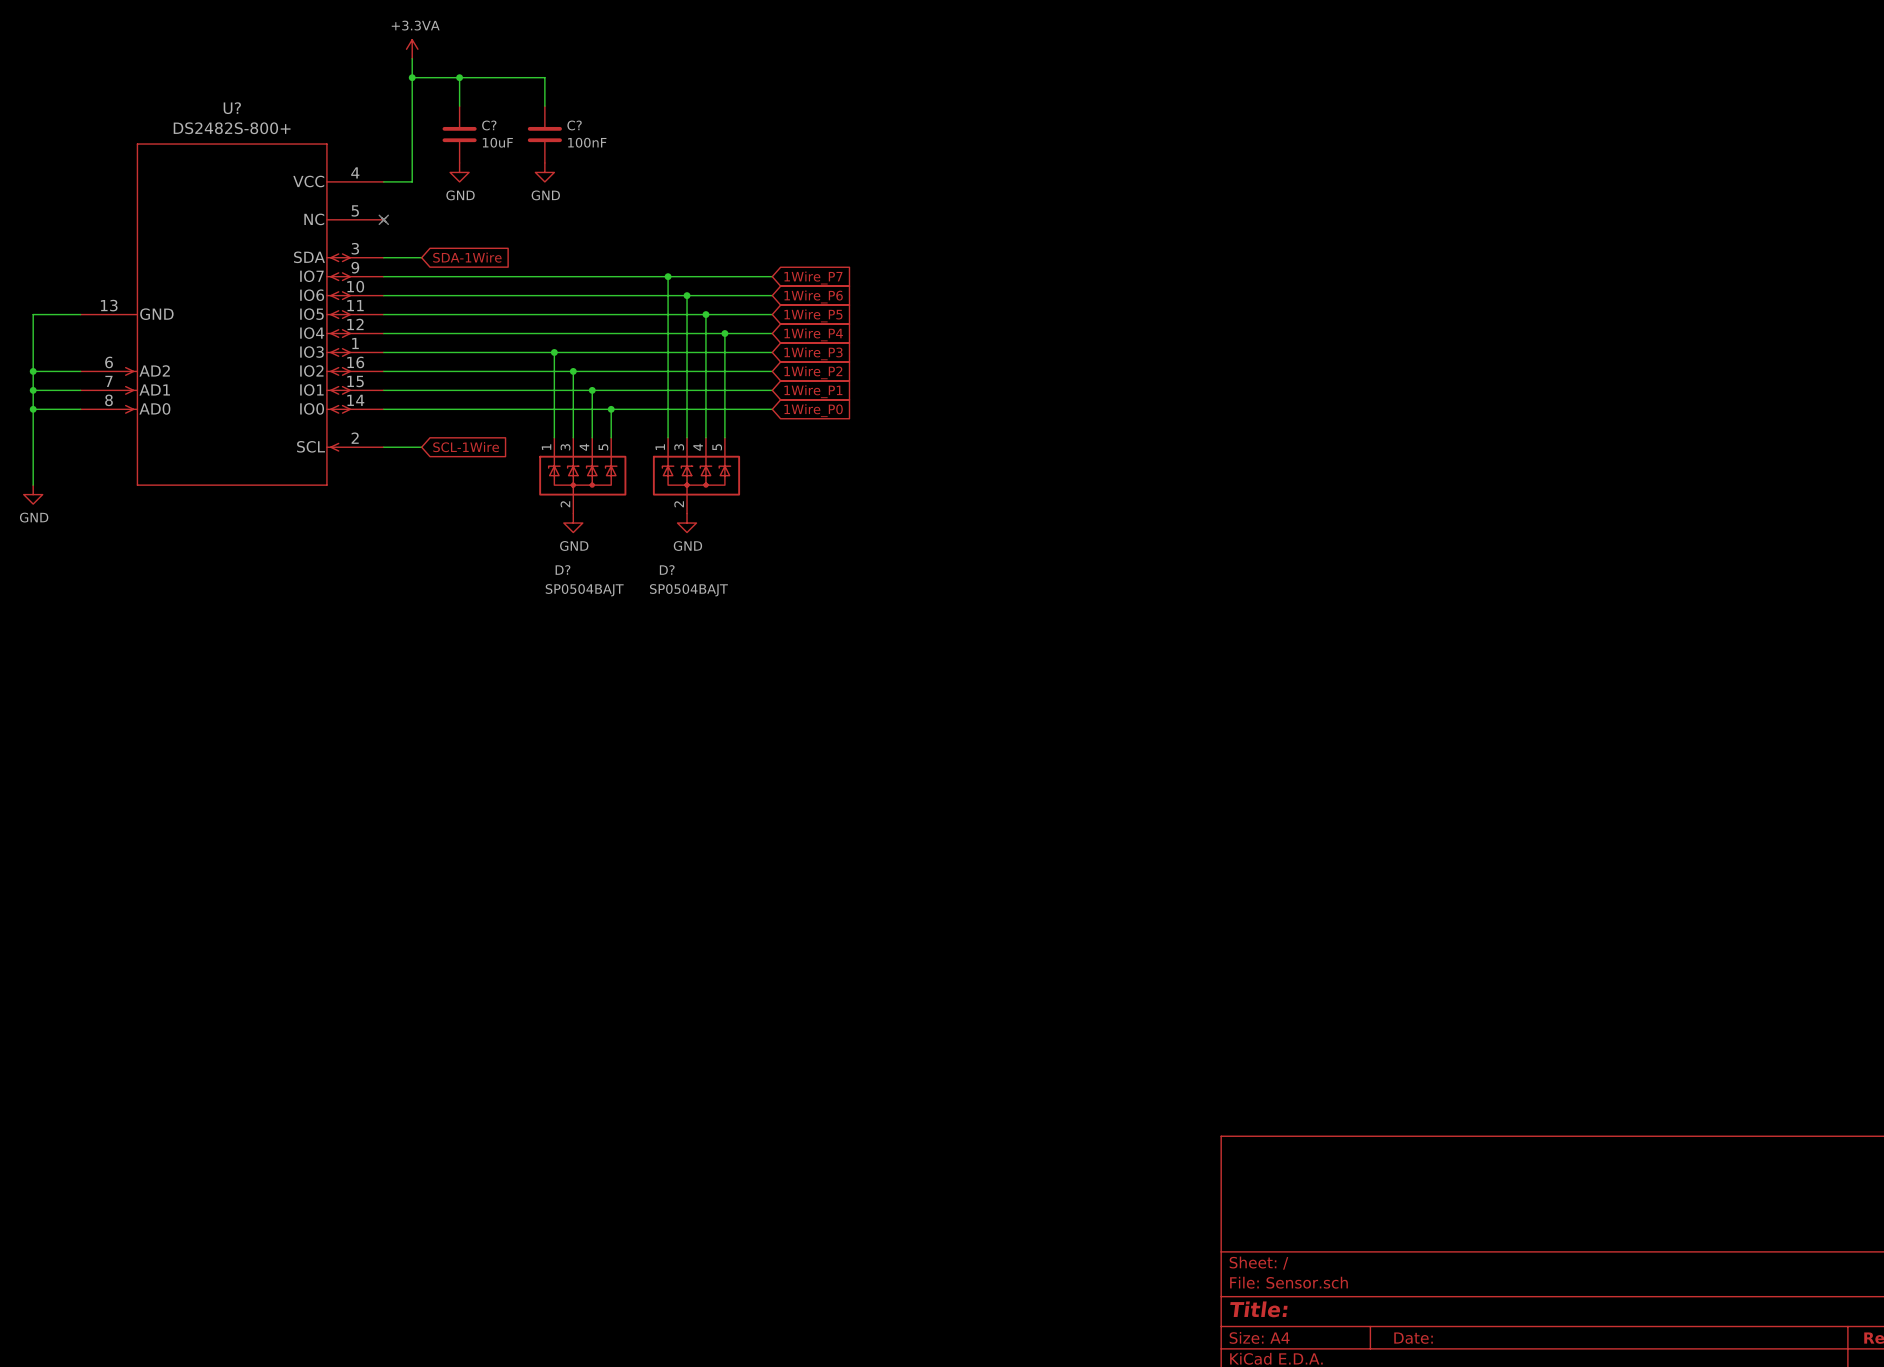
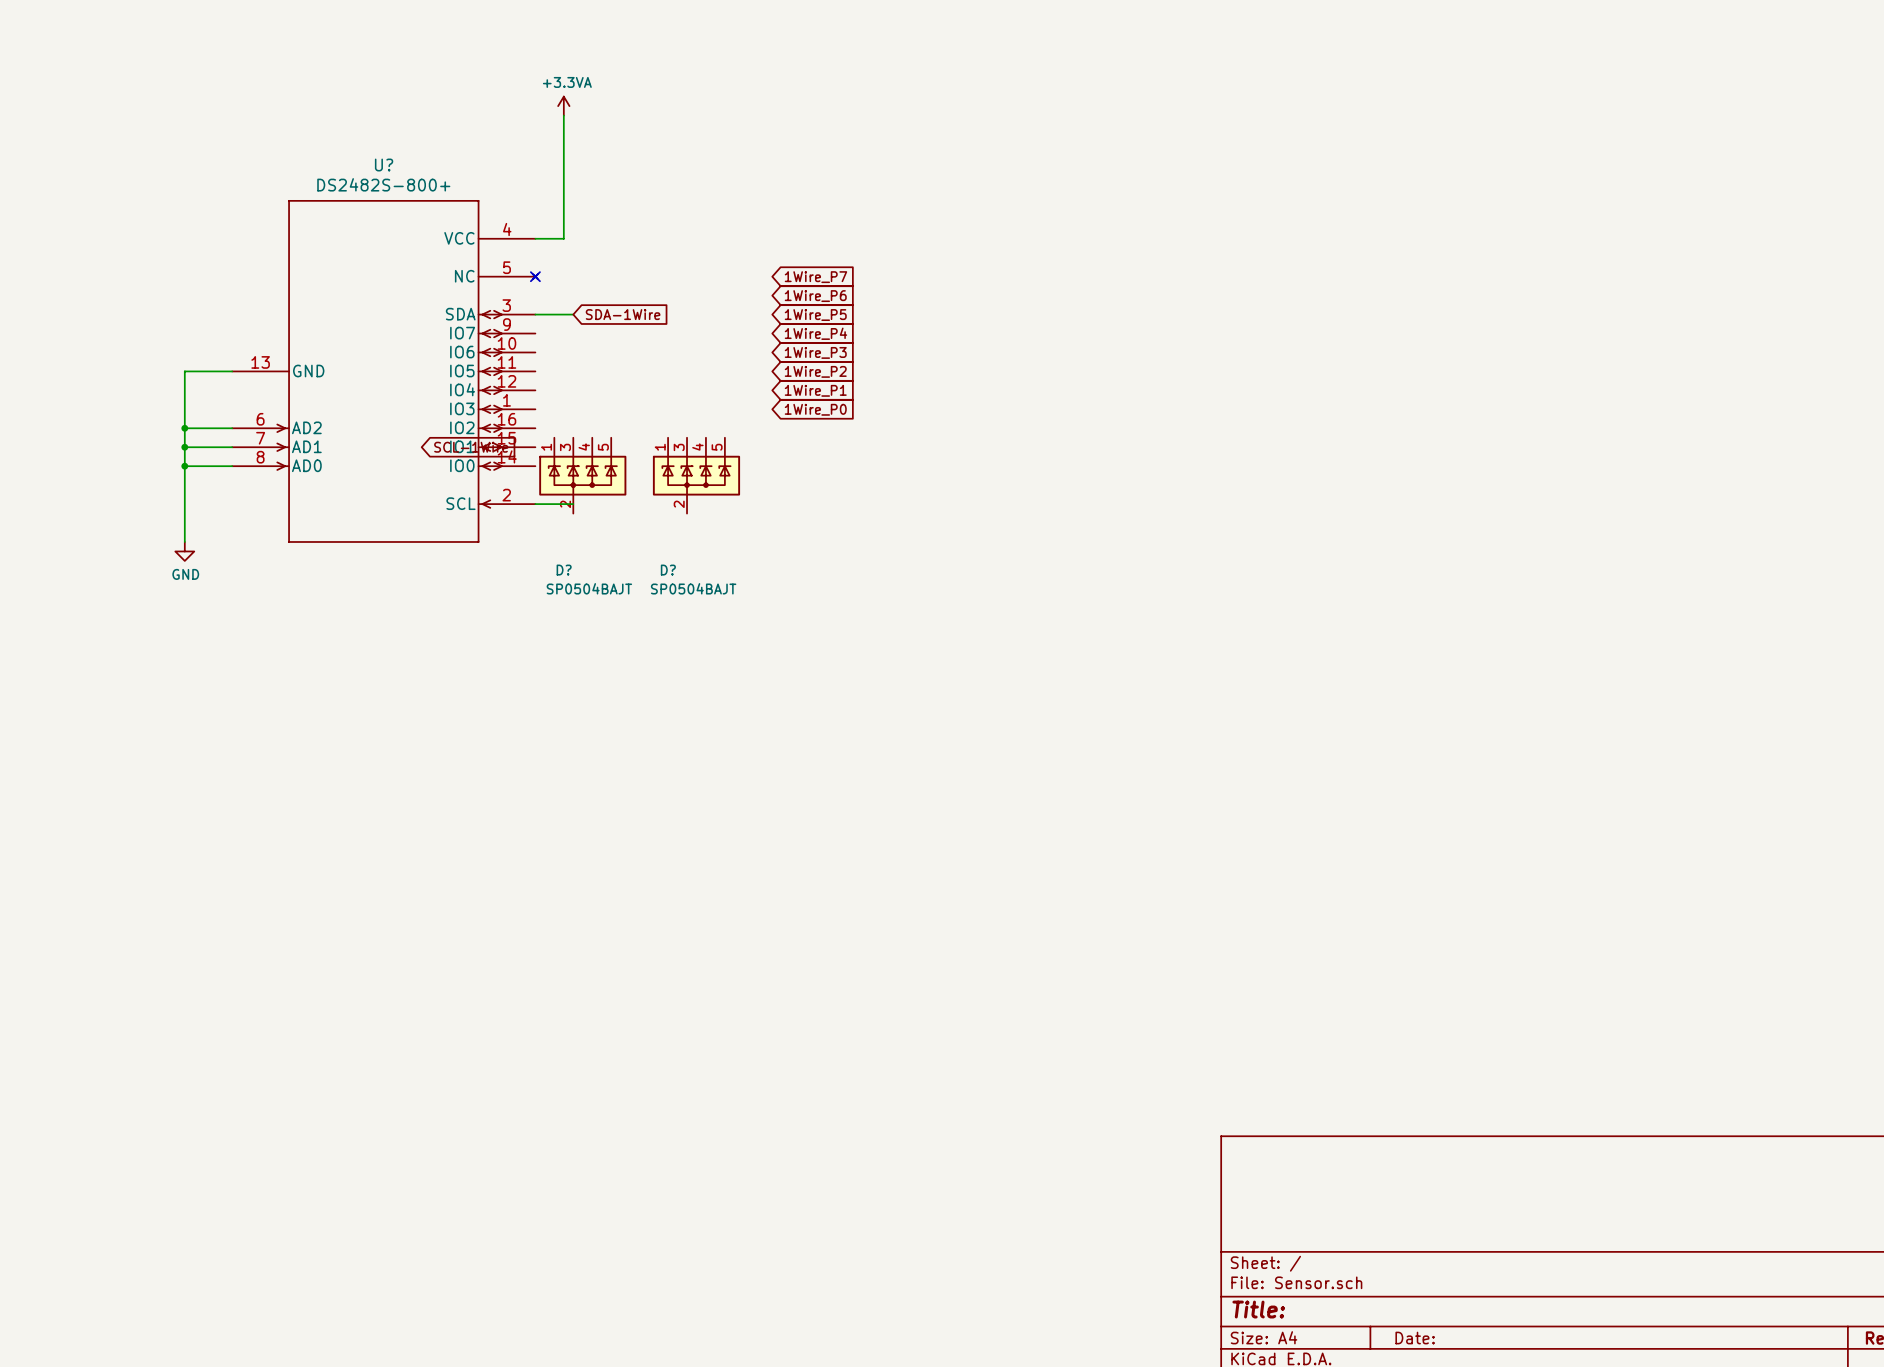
power symbol position: +3.3VA (412, 49) -> +3.3VA (563, 106)
wire: (412, 58) (412, 181) (383, 181) -> (563, 115) (563, 238) (535, 238)
wire: (412, 77) (544, 77) (544, 106) -> none
junction: (412, 77) -> none
wire: (459, 77) (459, 106) -> none
junction: (459, 77) -> none
C?: 10uF (459, 134) -> none
C?: 100nF (544, 134) -> none
power symbol: GND (459, 172) -> none
power symbol: GND (544, 172) -> none
no-connect mark: (383, 219) -> none
wire: (383, 257) (421, 257) -> none
global label position: SDA-1Wire (467, 257) -> SDA-1Wire (623, 314)
wire: (383, 276) (772, 276) -> none
no-connect mark: none -> (535, 276)
wire: (668, 276) (668, 437) -> none
junction: (668, 276) -> none
wire: (383, 295) (772, 295) -> none
wire: (687, 295) (687, 437) -> none
junction: (687, 295) -> none
wire: (80, 314) (33, 314) (33, 485) -> (232, 371) (184, 371) (184, 541)
U? position: (233, 314) -> (384, 371)
wire: (383, 314) (535, 314) -> none
wire: (573, 314) (772, 314) -> none
wire: (705, 314) (705, 437) -> none
junction: (705, 314) -> none
wire: (383, 333) (772, 333) -> none
wire: (724, 333) (724, 437) -> none
junction: (724, 333) -> none
wire: (383, 352) (772, 352) -> none
wire: (554, 352) (554, 437) -> none
junction: (554, 352) -> none
wire: (33, 371) (80, 371) -> (184, 428) (232, 428)
junction: (33, 371) -> none
wire: (383, 371) (772, 371) -> none
wire: (573, 371) (573, 437) -> none
junction: (573, 371) -> none
wire: (33, 390) (80, 390) -> (184, 447) (232, 447)
junction: (33, 390) -> none
wire: (383, 390) (772, 390) -> none
wire: (592, 390) (592, 437) -> none
junction: (592, 390) -> none
wire: (33, 409) (80, 409) -> (184, 466) (232, 466)
junction: (33, 409) -> none
wire: (383, 409) (772, 409) -> none
wire: (611, 409) (611, 437) -> none
junction: (611, 409) -> none
junction: none -> (184, 428)
junction: none -> (184, 447)
wire: (383, 447) (421, 447) -> (535, 504) (573, 504)
junction: none -> (184, 466)
power symbol position: GND (33, 494) -> GND (184, 551)
power symbol: GND (573, 523) -> none
power symbol: GND (687, 523) -> none

